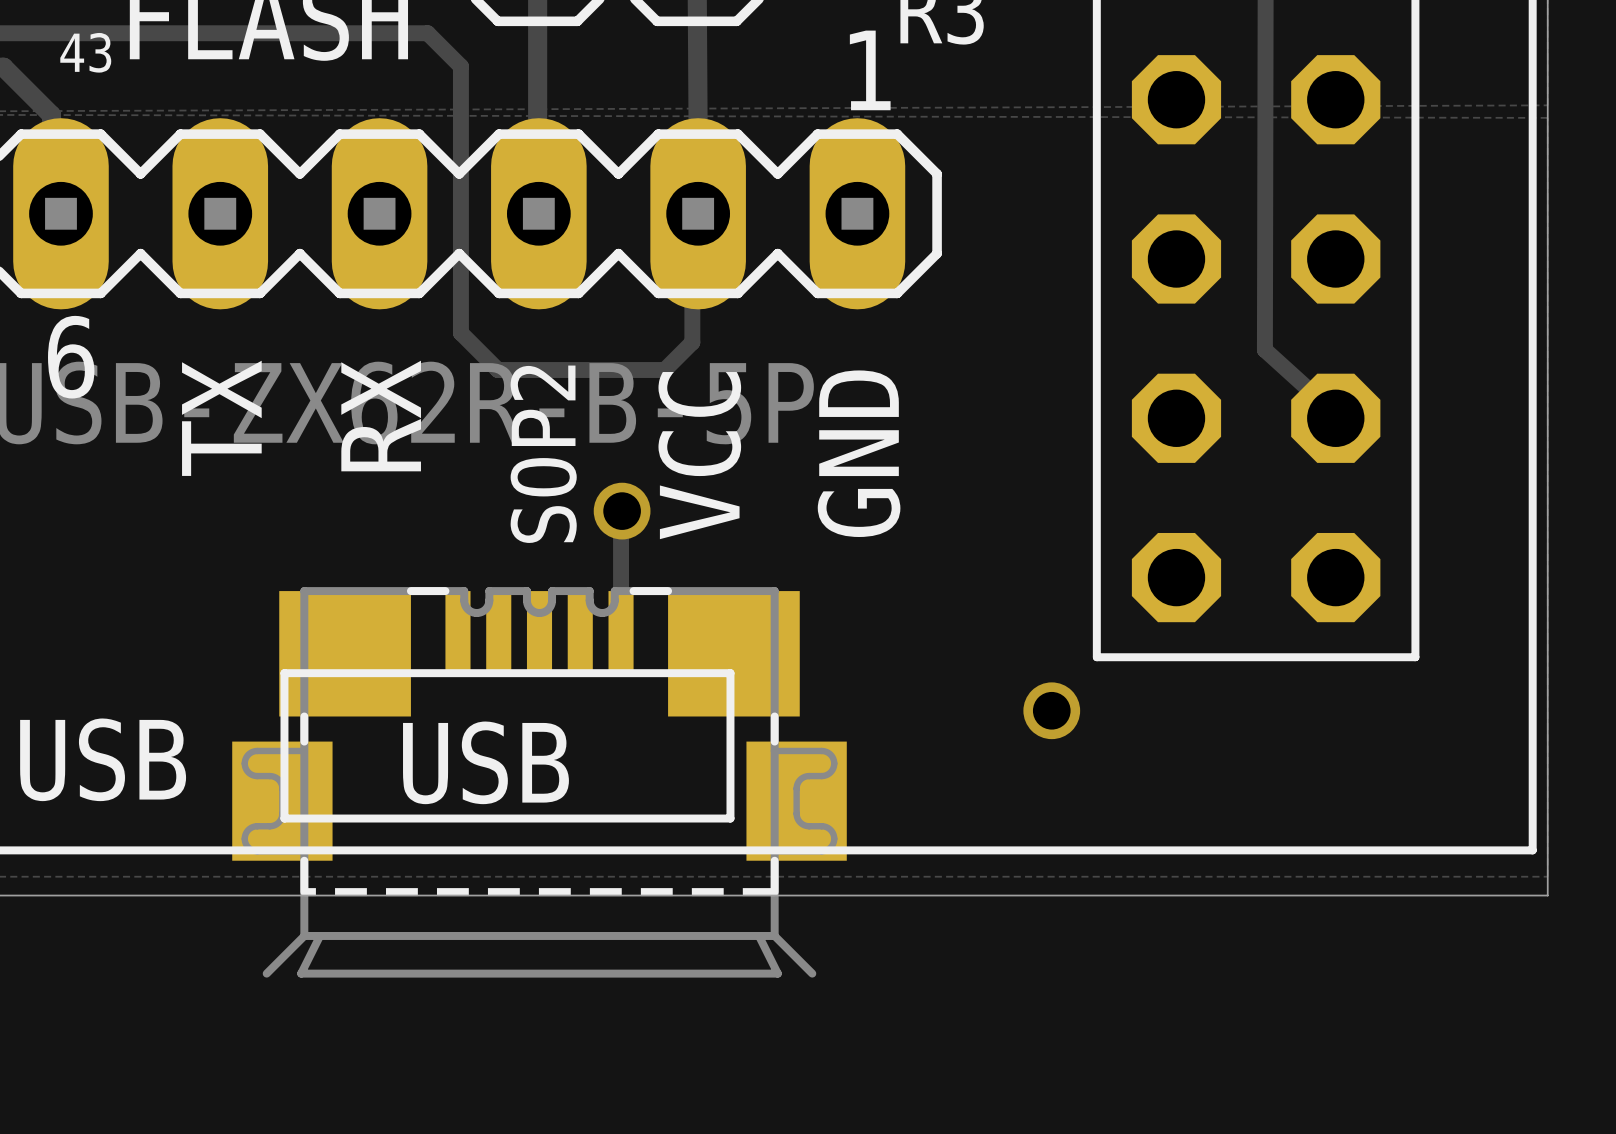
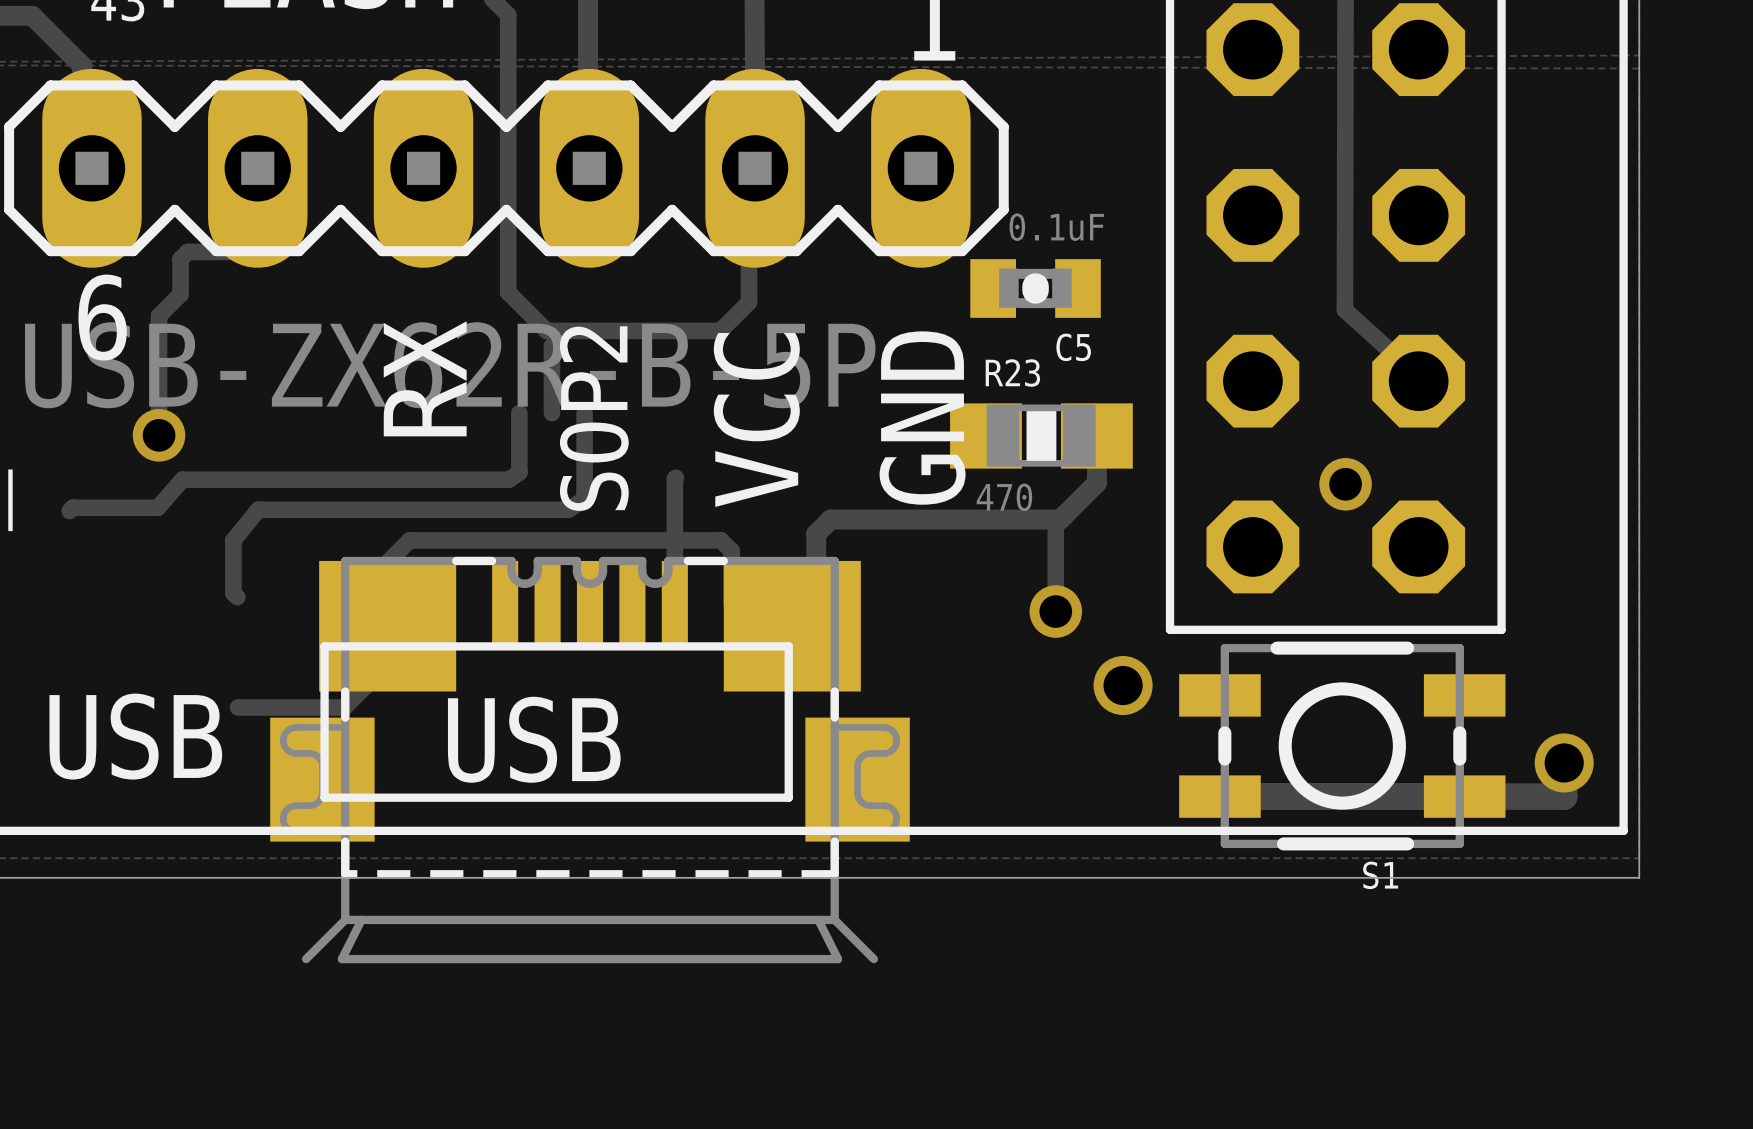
track: none -> (258, 249) (256, 251) (187, 251) (180, 259) (180, 294) (159, 315) (159, 435)
C5: none -> 0.1uF (1035, 288)
track: none -> (551, 345) (551, 413)
text: TX (221, 418) -> none
track: none -> (519, 413) (519, 472) (508, 479) (182, 479) (157, 507) (72, 507) (69, 511)
track: none -> (584, 413) (584, 499) (568, 509) (258, 509) (233, 540) (233, 593) (237, 597)
via: none -> (159, 435)
R23: none -> 470 (1041, 435)
track: none -> (1096, 435) (1096, 482) (1060, 519) (830, 519) (816, 533) (816, 604)
via: (622, 511) -> none
via: none -> (1345, 484)
track: none -> (1064, 515) (1055, 524) (1055, 611)
track: none -> (731, 604) (731, 551) (720, 540) (409, 540) (364, 585) (364, 687) (344, 707) (238, 707)
via: none -> (1055, 611)
S1: none -> (1342, 746)
track: none -> (1564, 762) (1564, 796) (1219, 796)
via: none -> (1564, 762)

